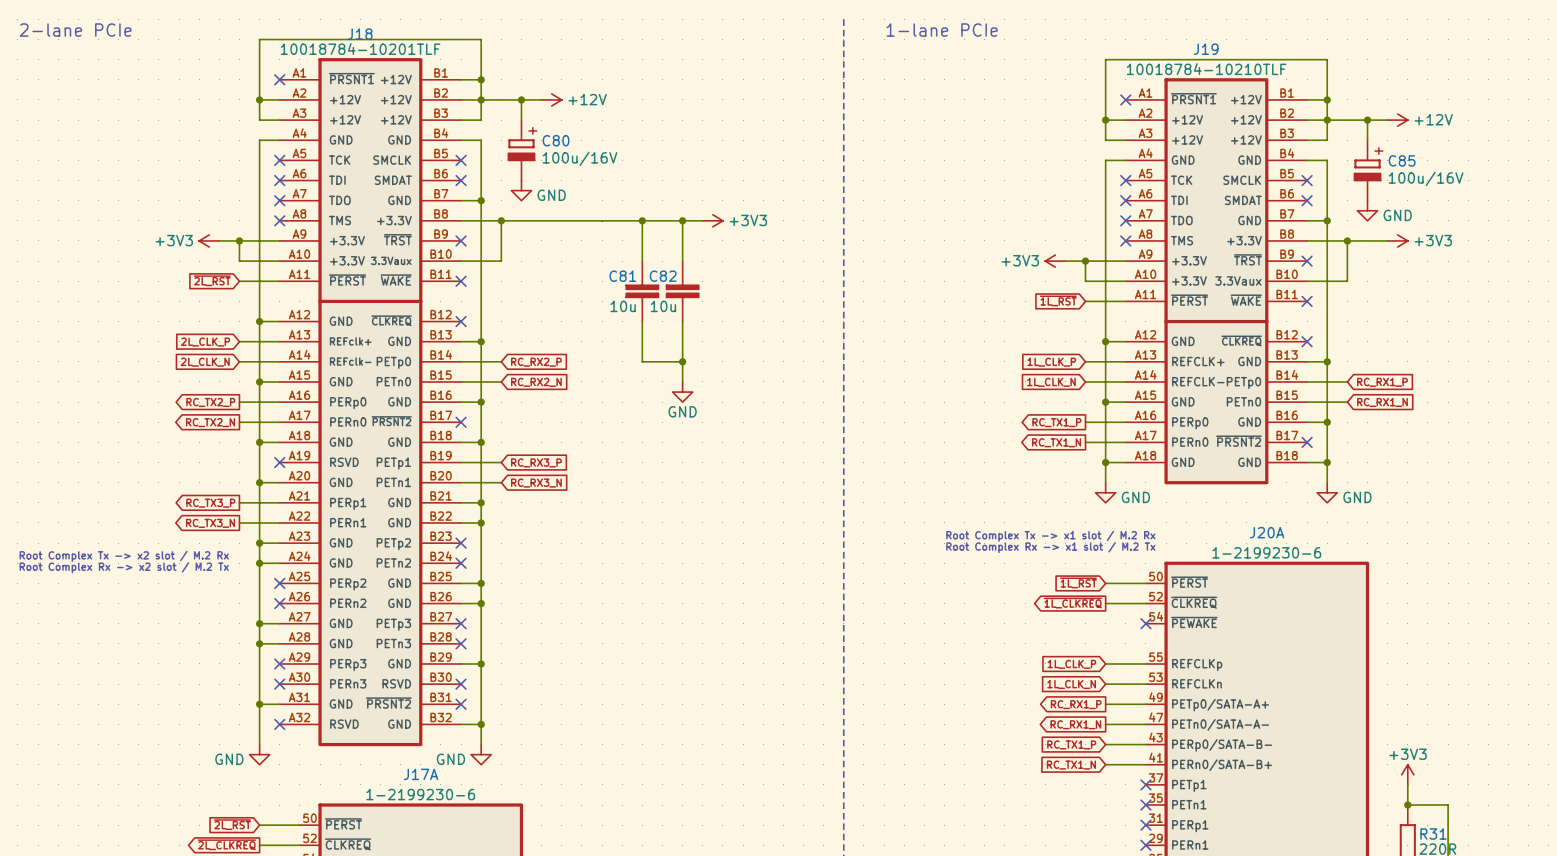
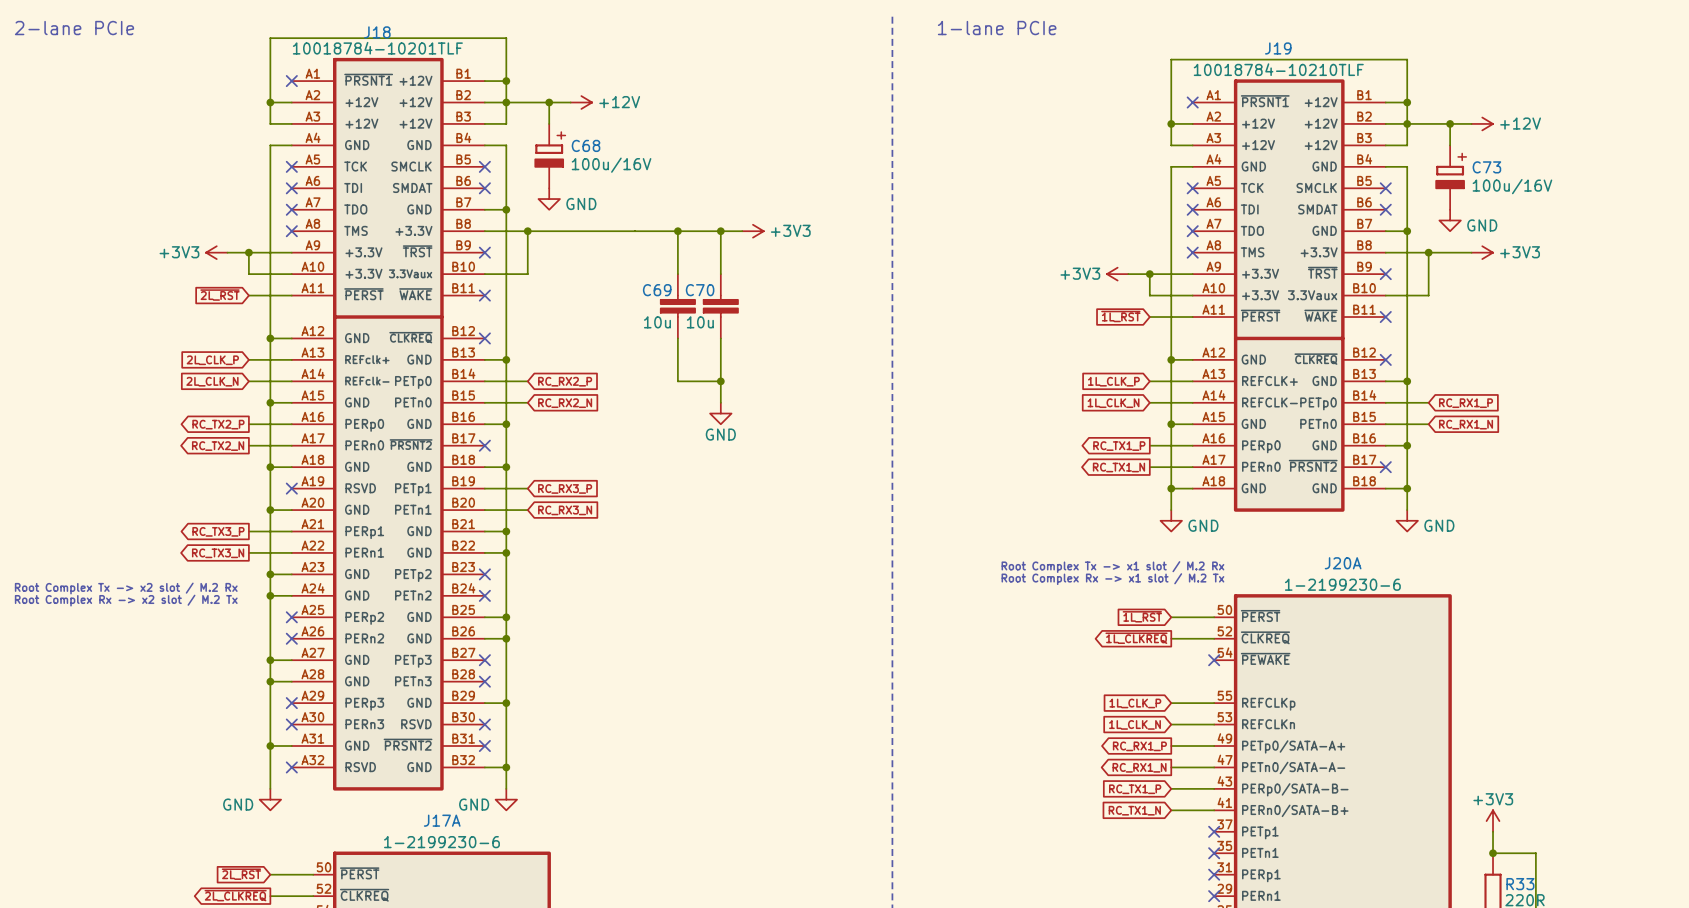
C80 name: C80 (556, 140) -> C68 (586, 145)
C85 name: C85 (1402, 160) -> C73 (1486, 167)
C81 name: C81 (622, 276) -> C69 (657, 290)
C82 name: C82 (663, 276) -> C70 (700, 290)
R31 name: R31 (1433, 833) -> R33 (1520, 884)

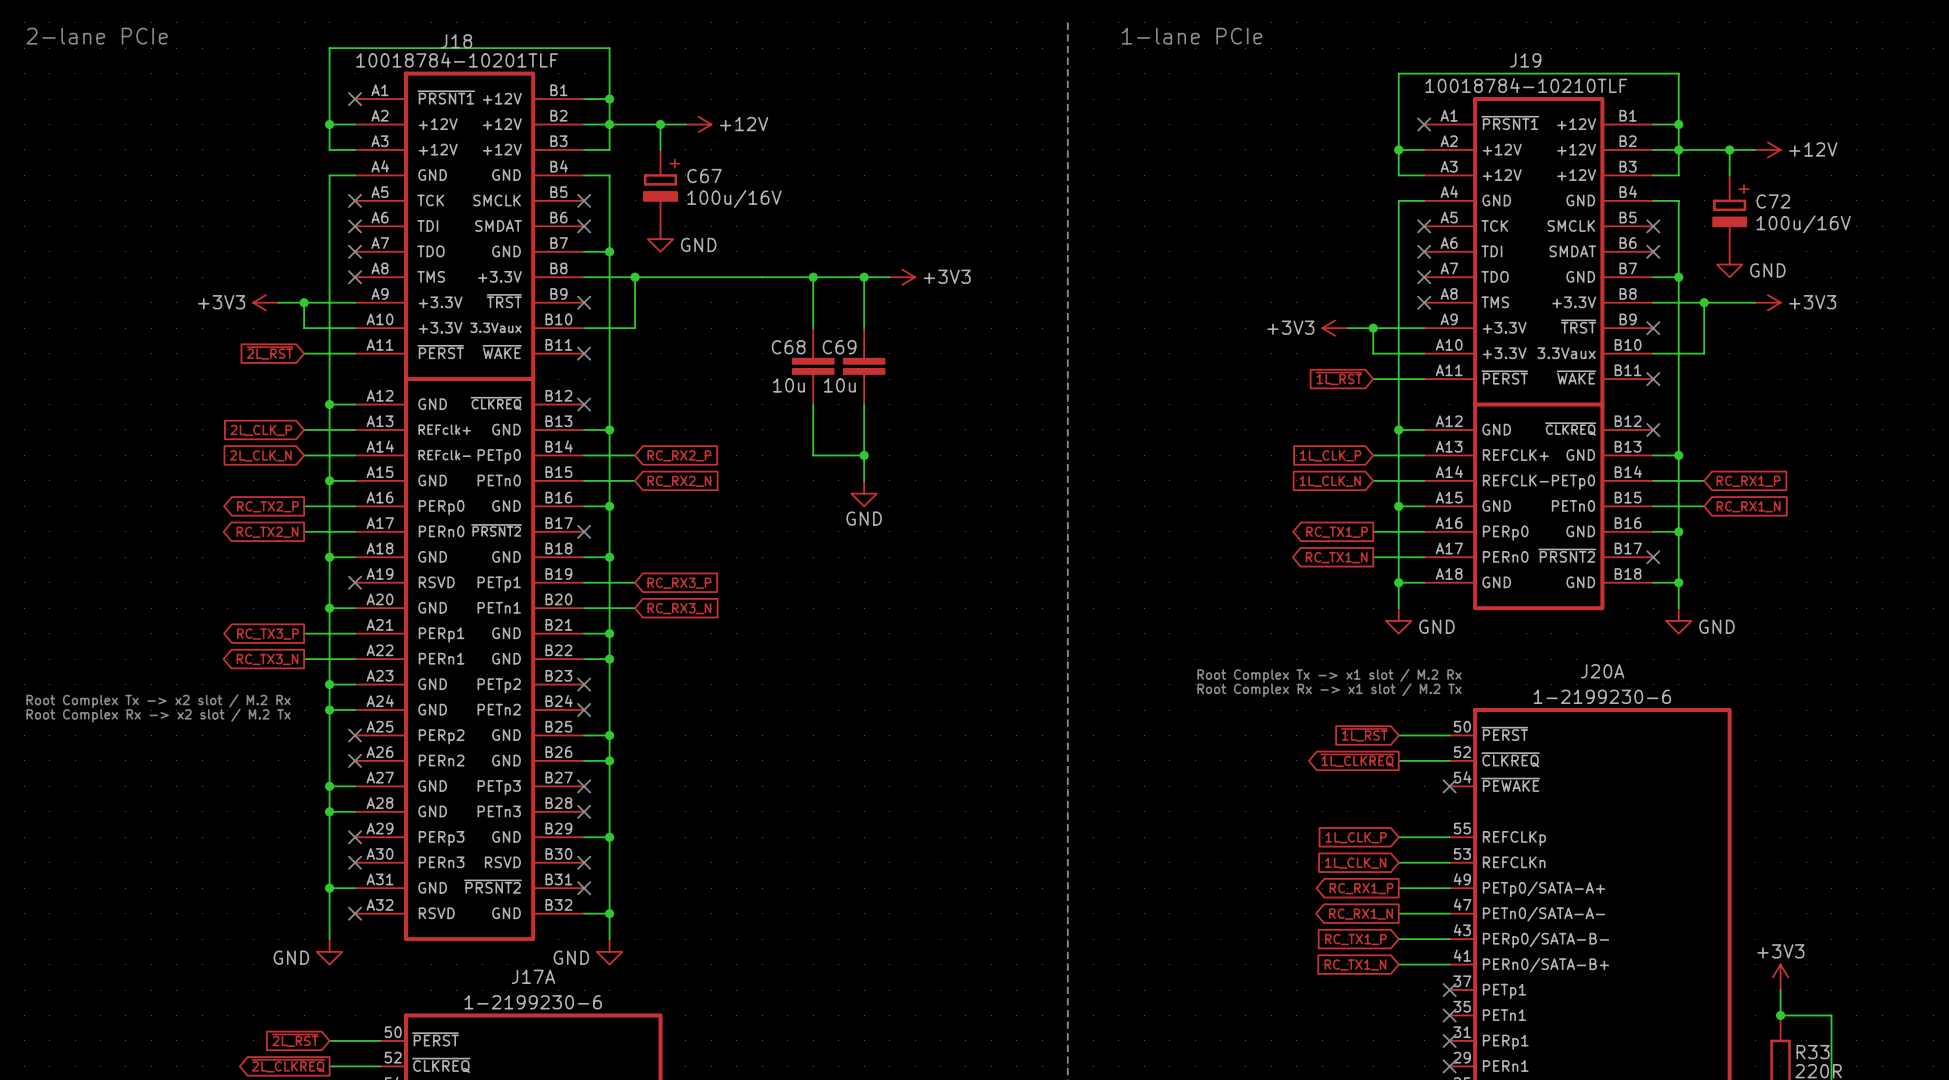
C68 name: C68 (586, 145) -> C67 (704, 176)
C73 name: C73 (1486, 167) -> C72 (1773, 201)
C69 name: C69 (657, 290) -> C68 (788, 347)
C70 name: C70 (700, 290) -> C69 (839, 347)

